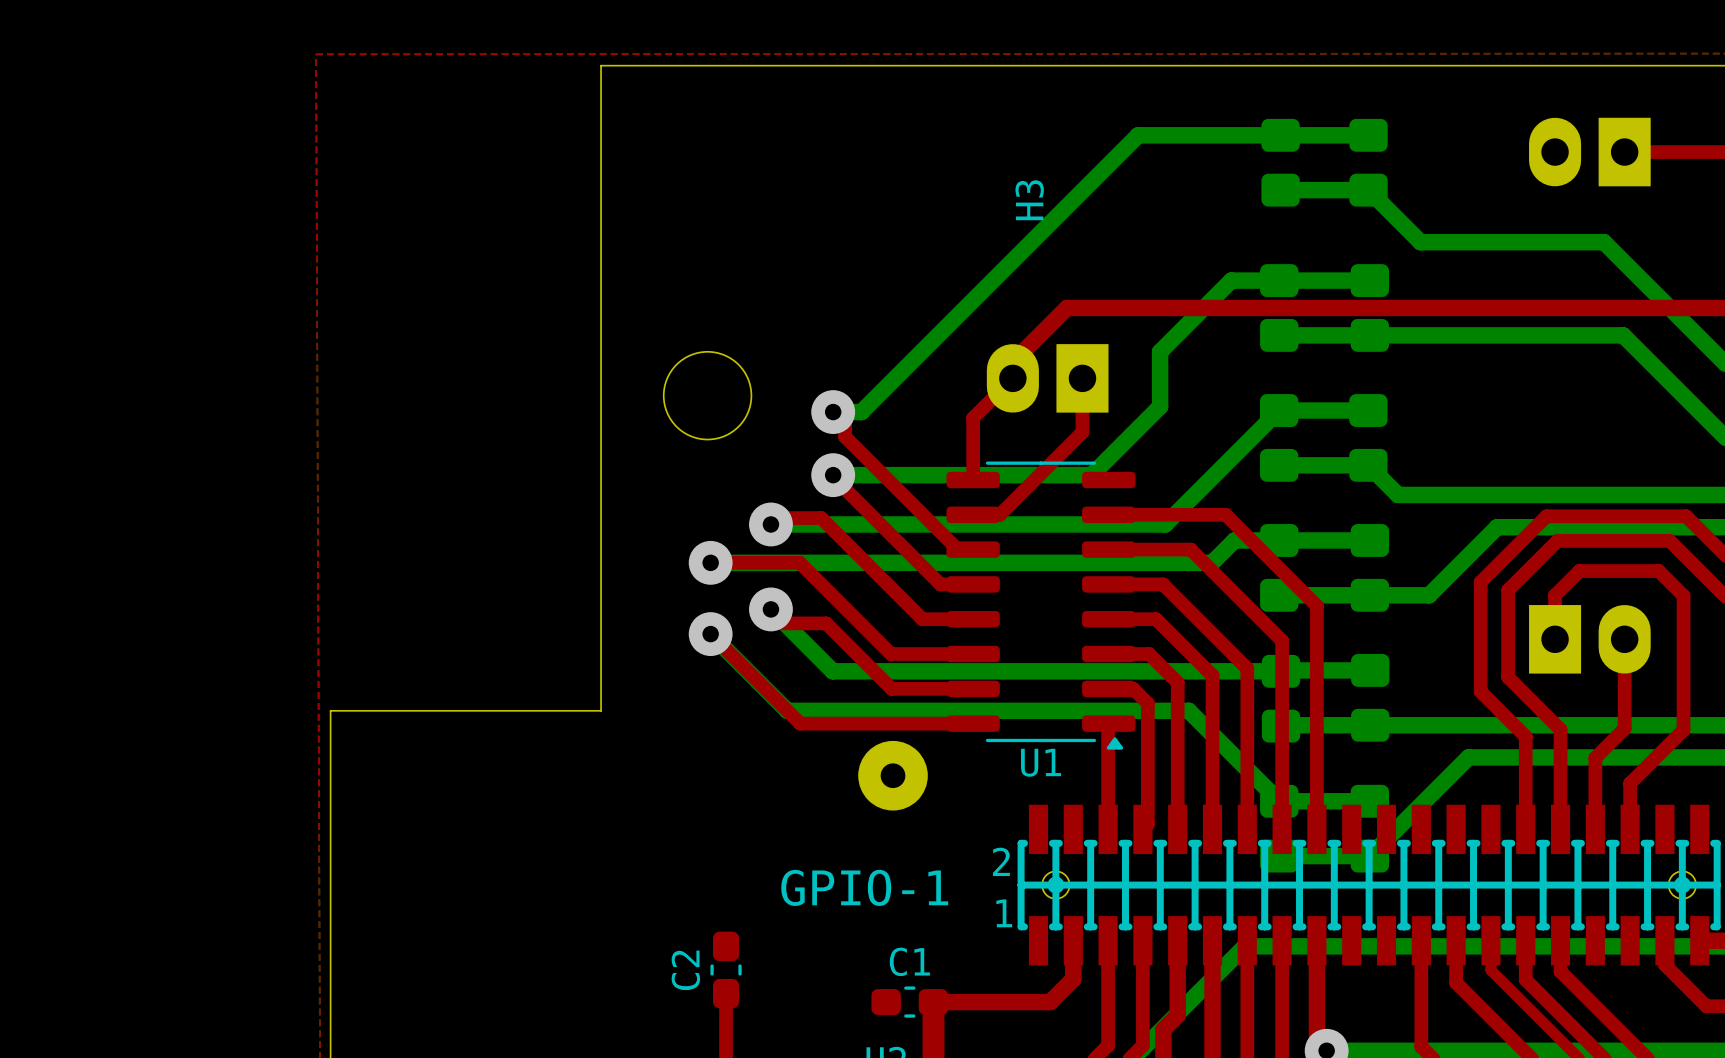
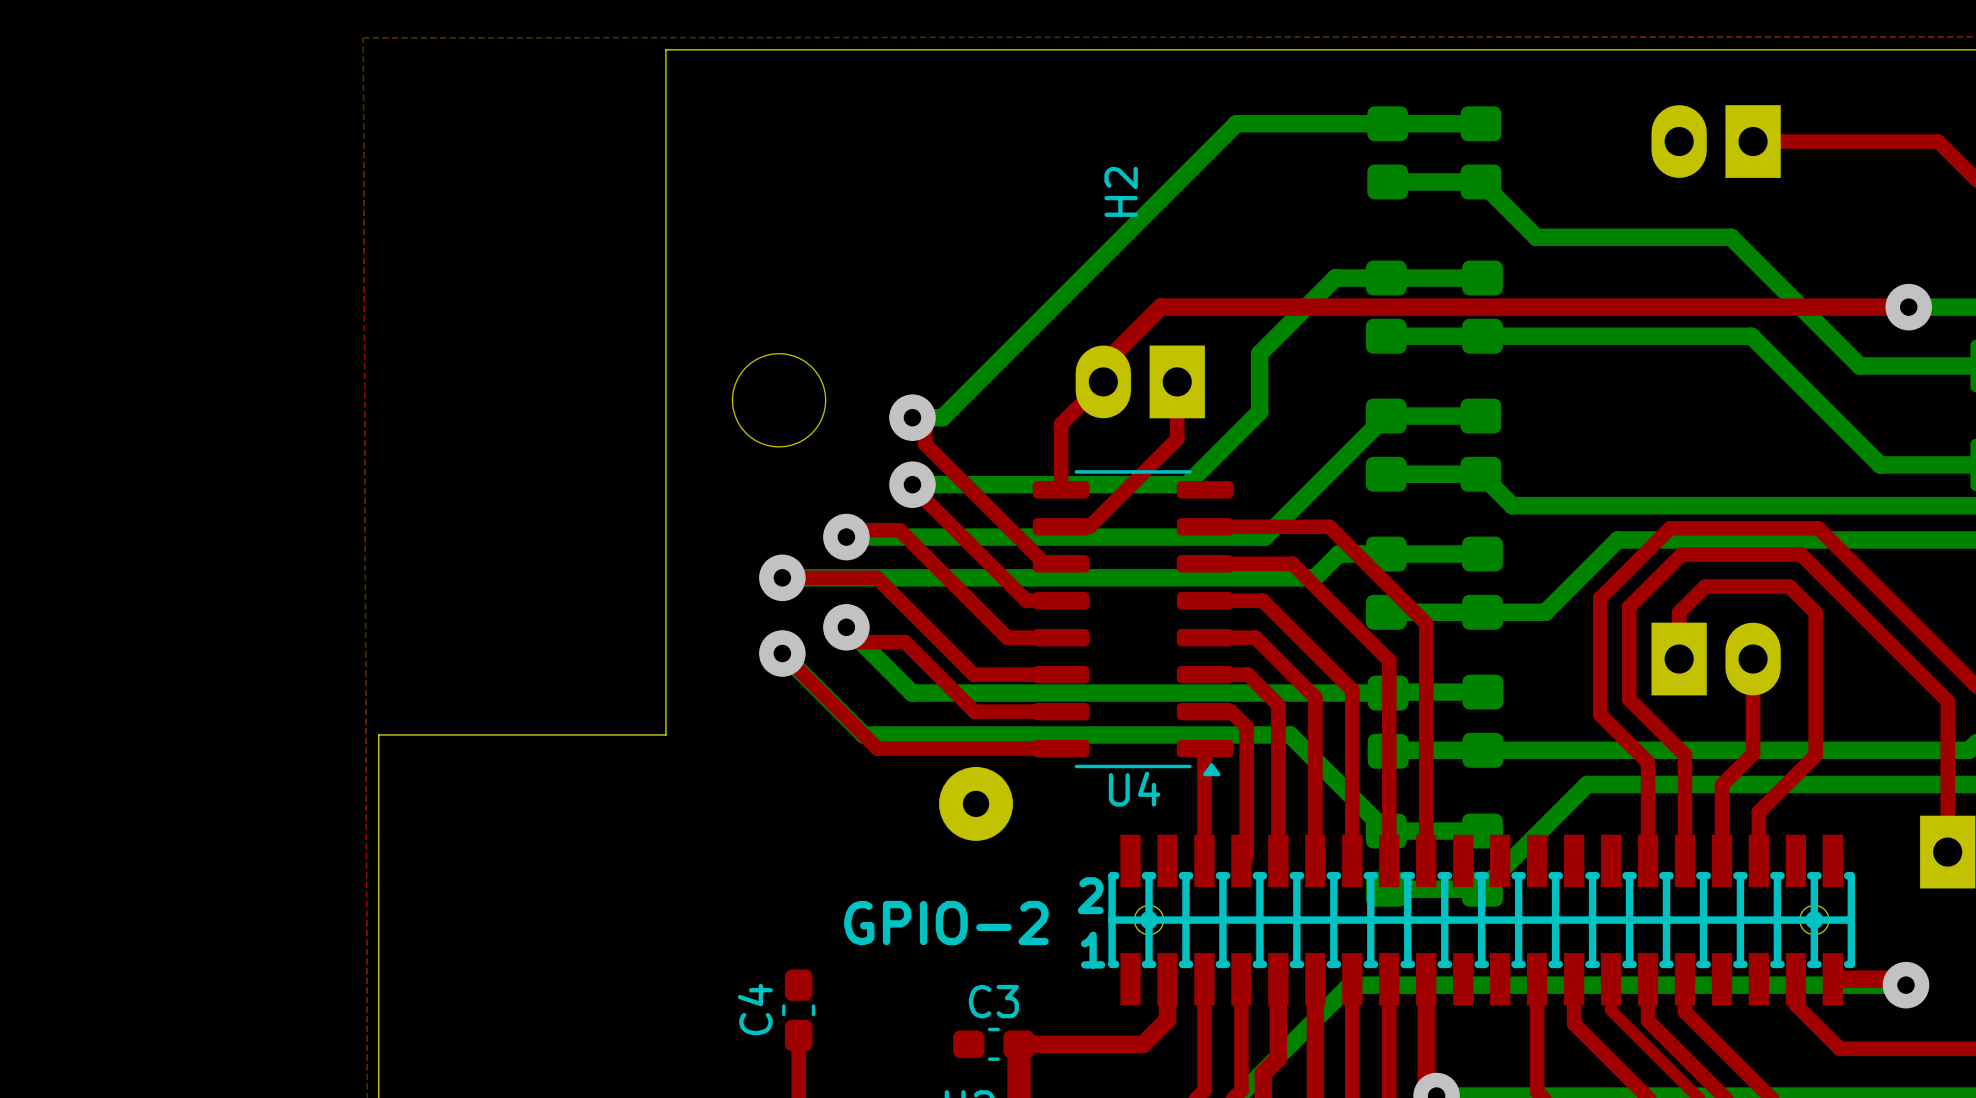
H3 name: H3 (1029, 200) -> H2 (1121, 191)
U1 name: U1 (1041, 762) -> U4 (1134, 789)
GPIO-1 name: GPIO-1 (864, 887) -> GPIO-2 (946, 923)
C1 name: C1 (909, 961) -> C3 (993, 1001)
C2 name: C2 (685, 970) -> C4 (755, 1009)

